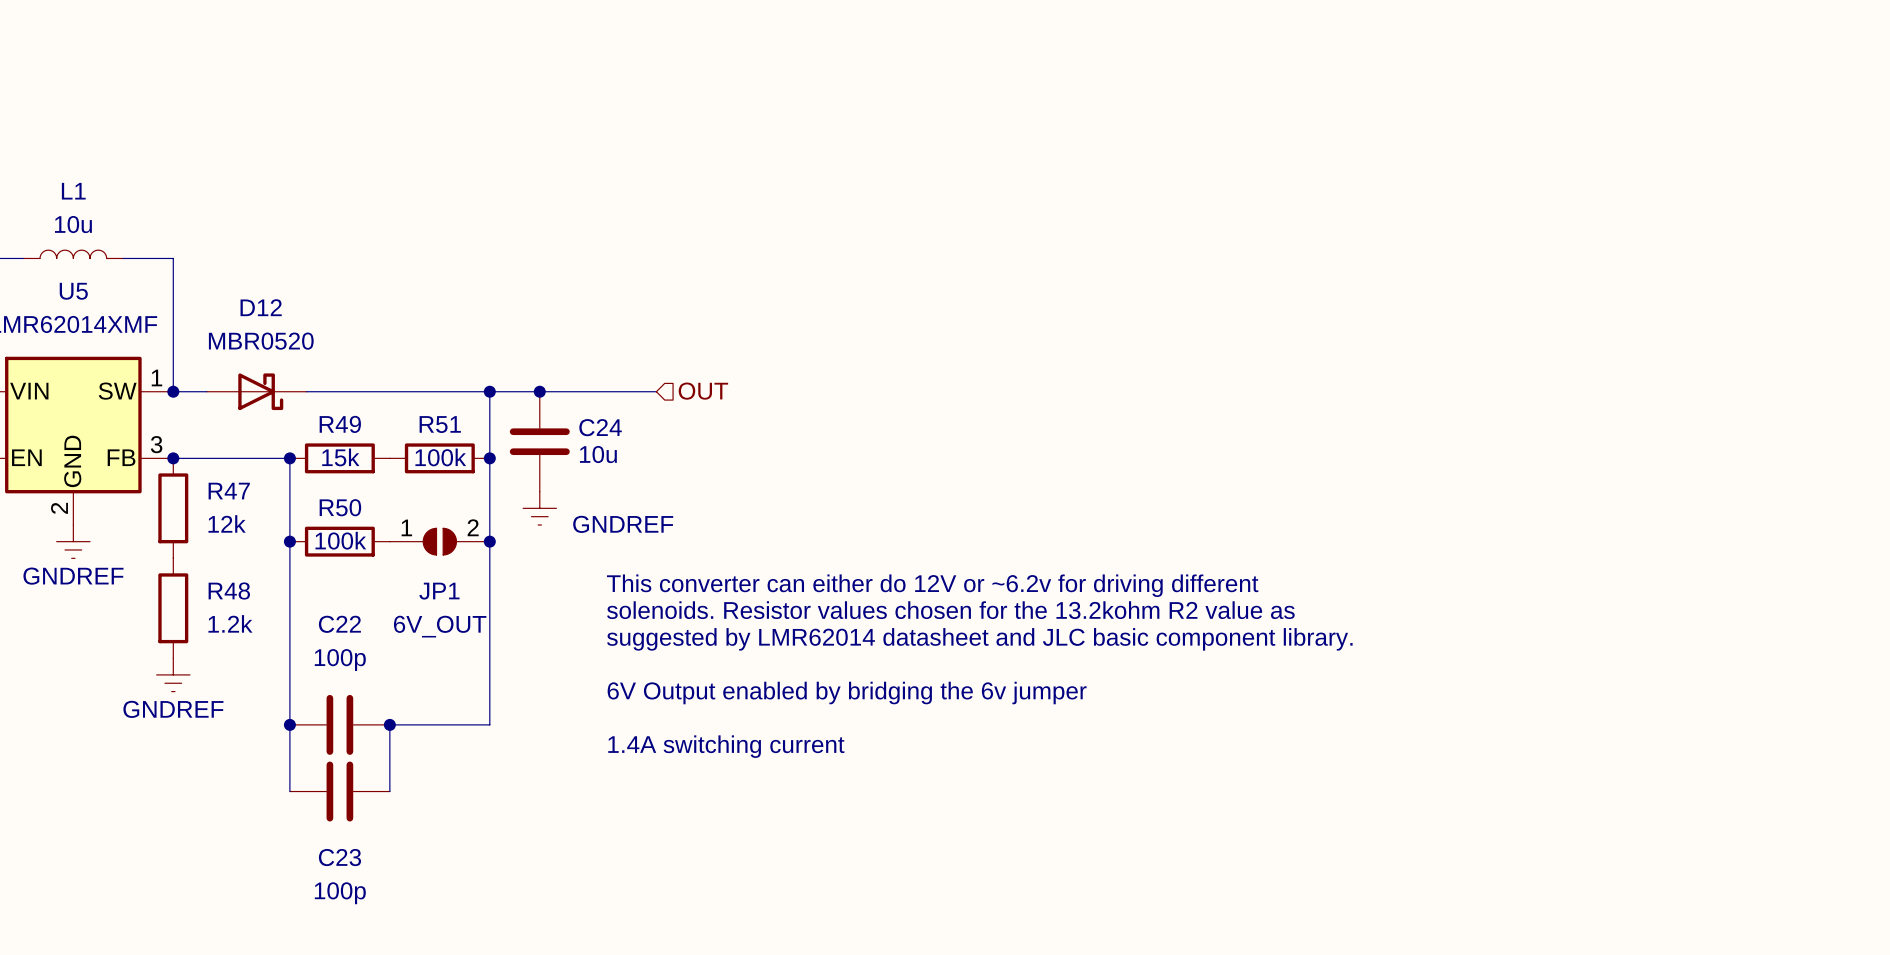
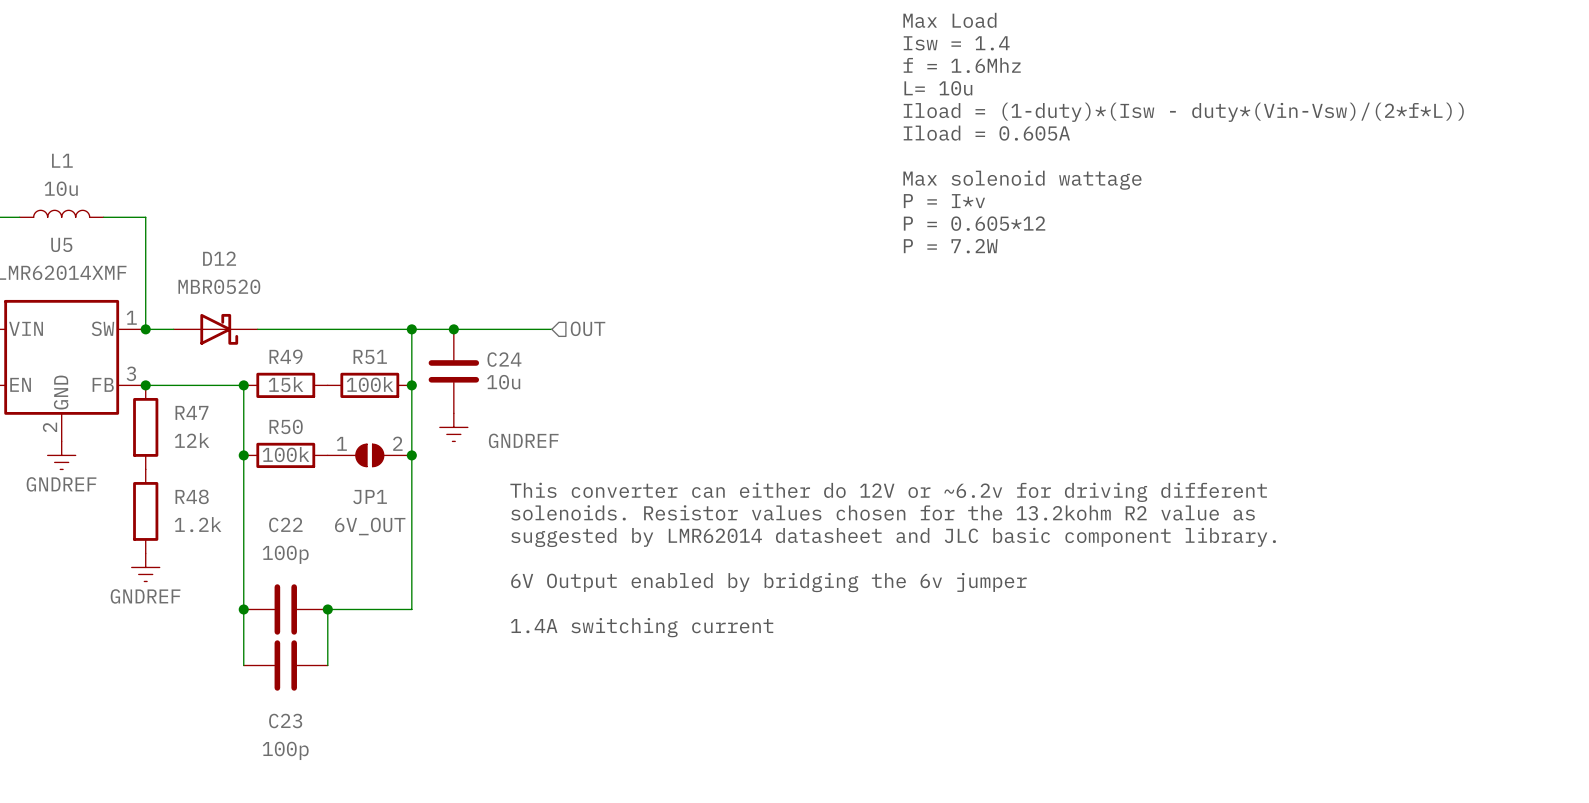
text: none -> Max Load (949, 20)
text: none -> Isw = 1.4 (956, 43)
text: none -> f = 1.6Mhz (962, 65)
text: none -> L= 10u (938, 88)
text: none -> Iload = (1-duty)*(Isw - duty*(Vin-Vsw)/(2*f*L)) (1183, 112)
text: none -> Iload = 0.605A (986, 133)
text: none -> Max solenoid wattage (1022, 180)
text: none -> P = I*v (944, 201)
text: none -> P = 0.605*12 (974, 223)
text: none -> P = 7.2W (950, 246)

